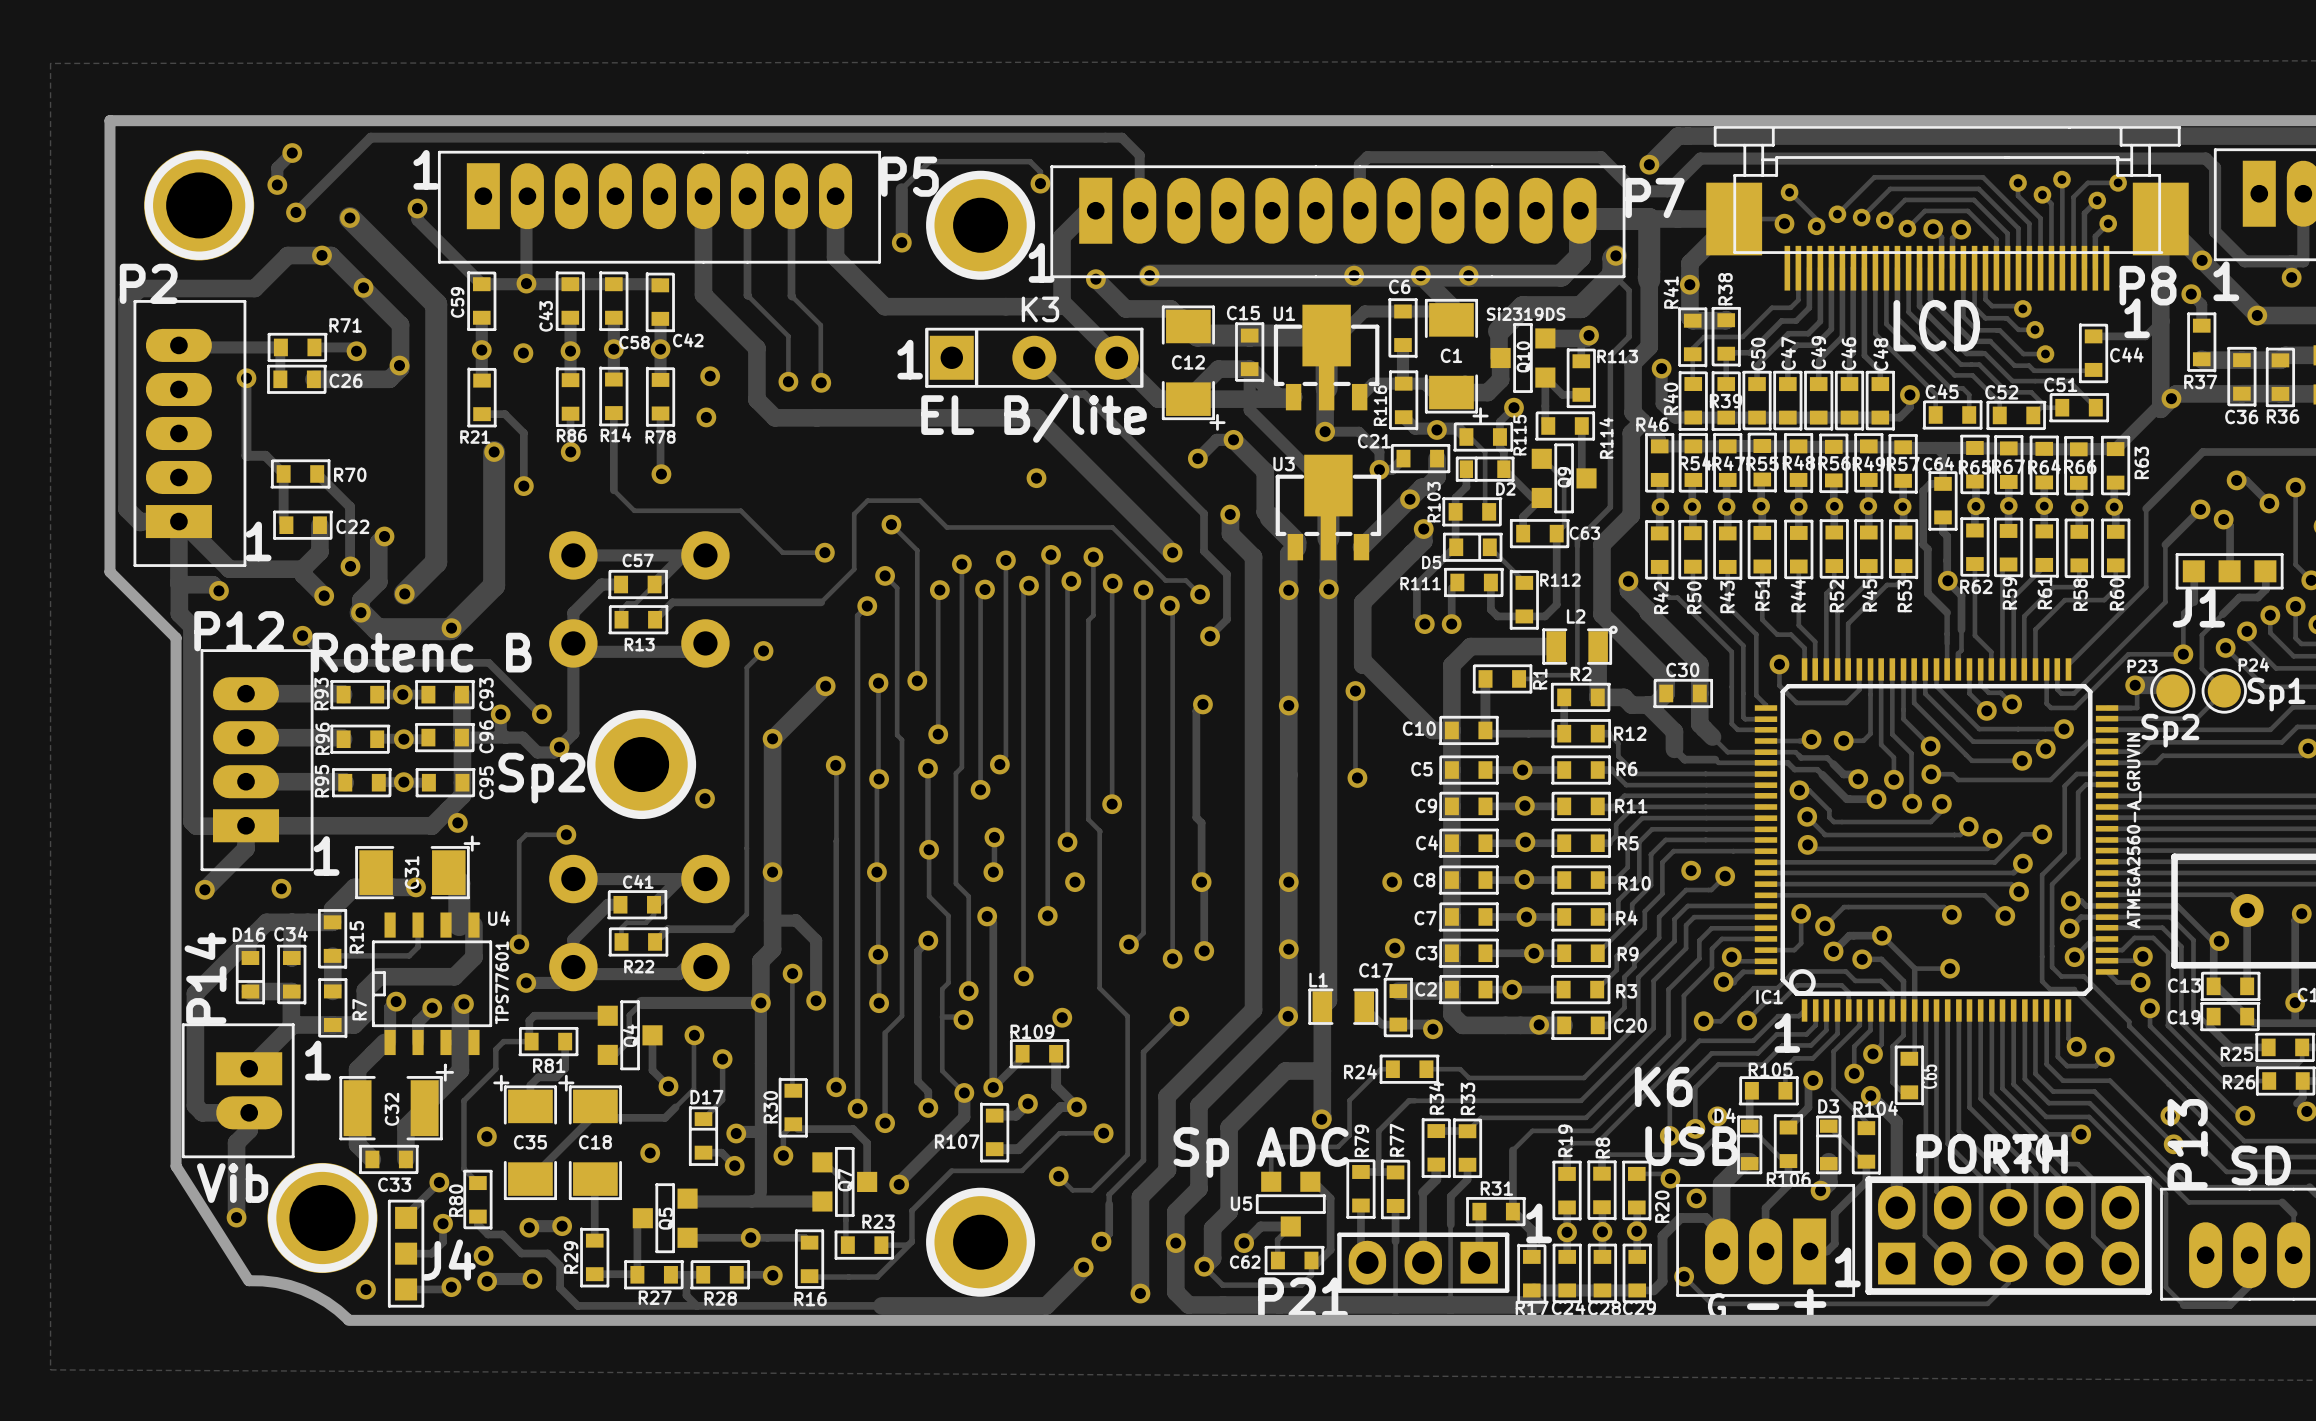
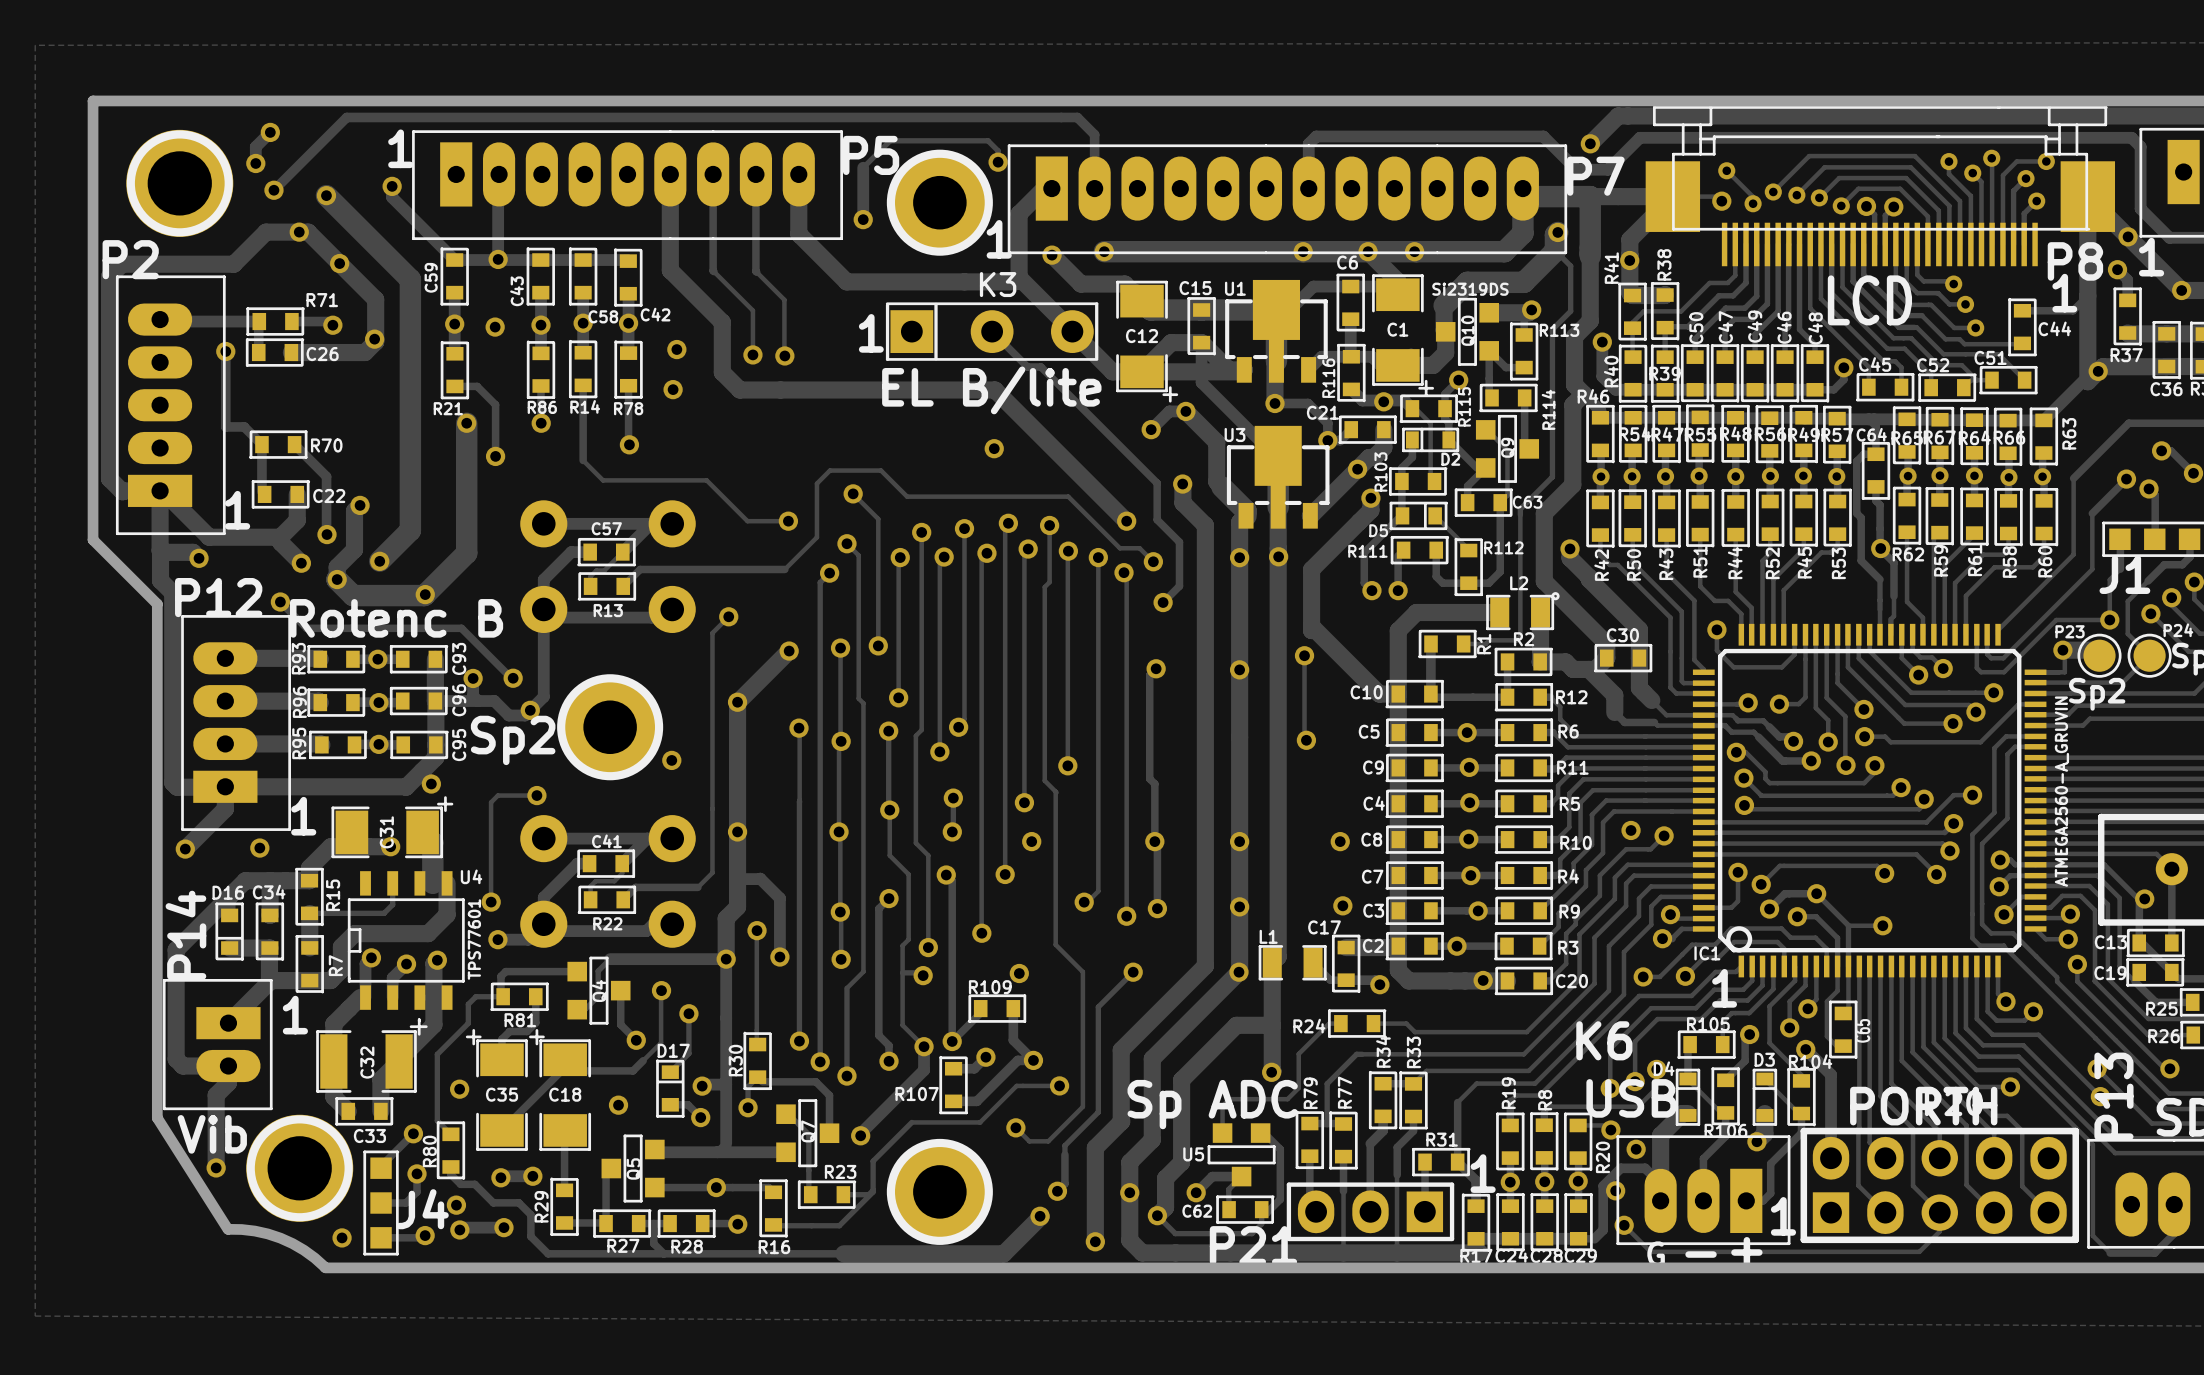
via: none -> (1615, 1190)

